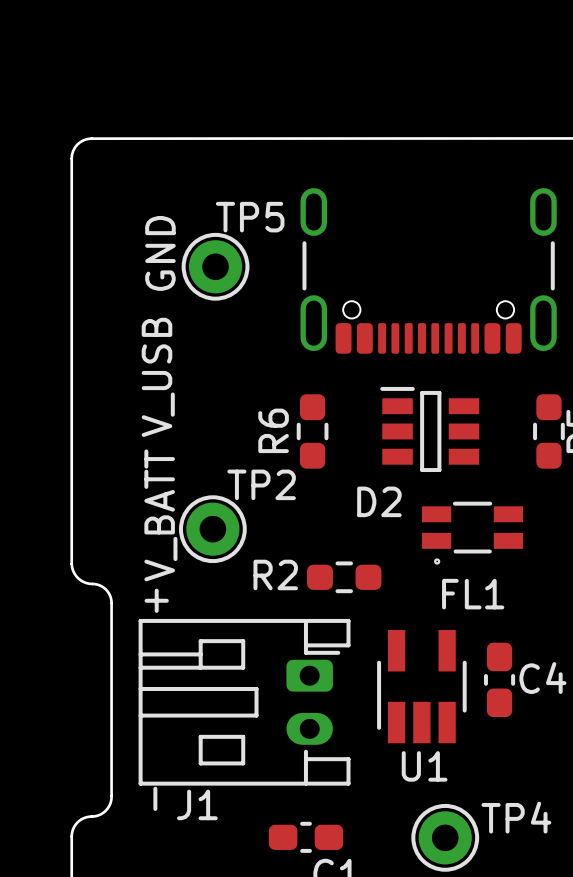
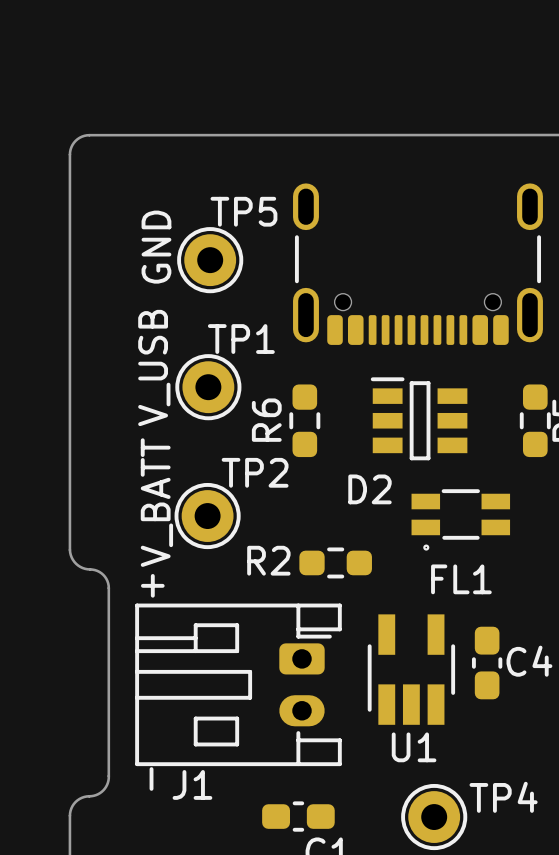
TP1: none -> (208, 387)

